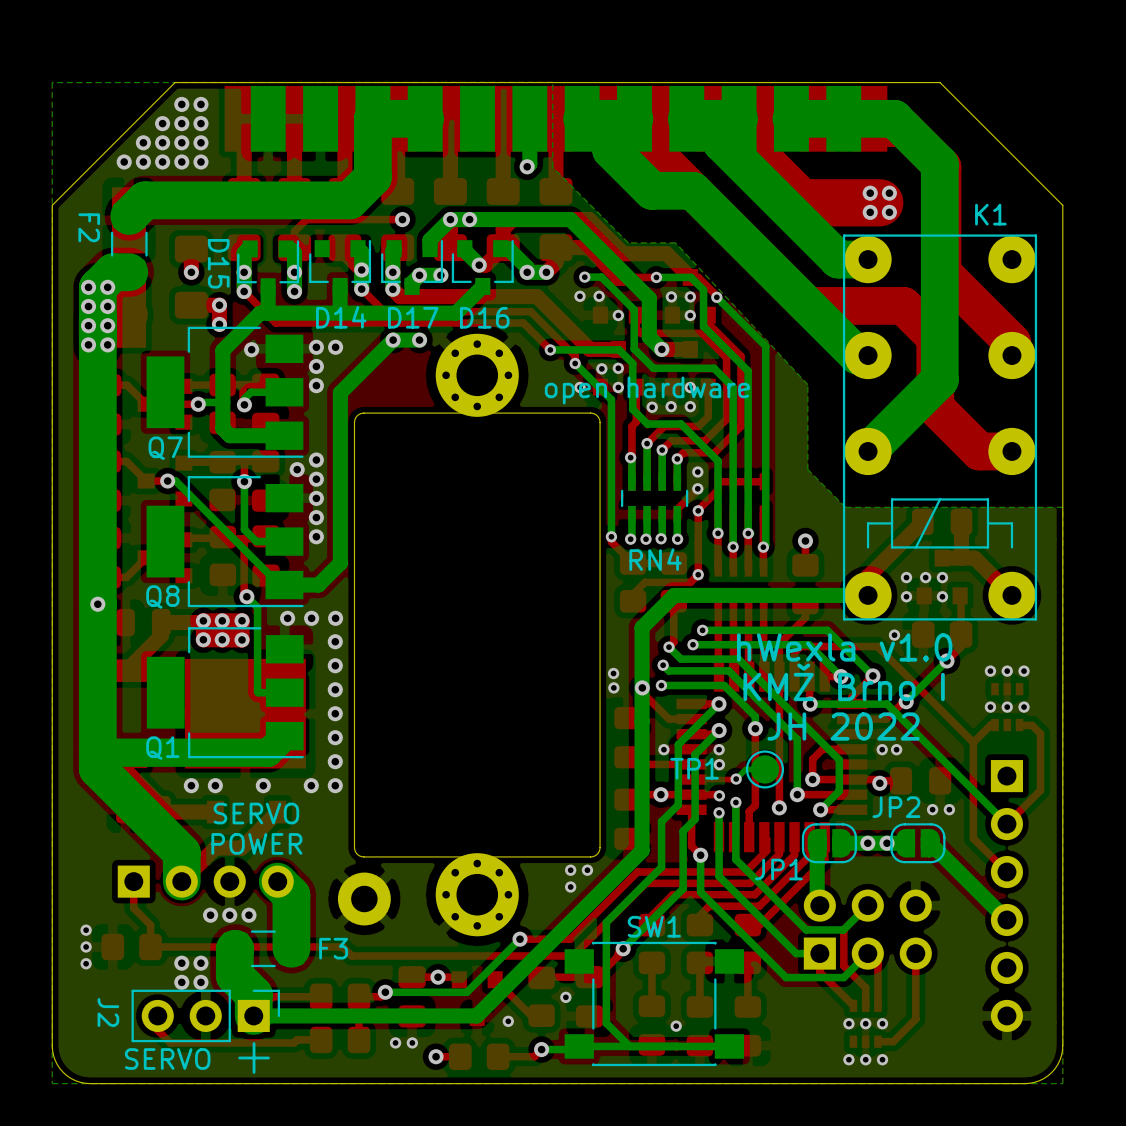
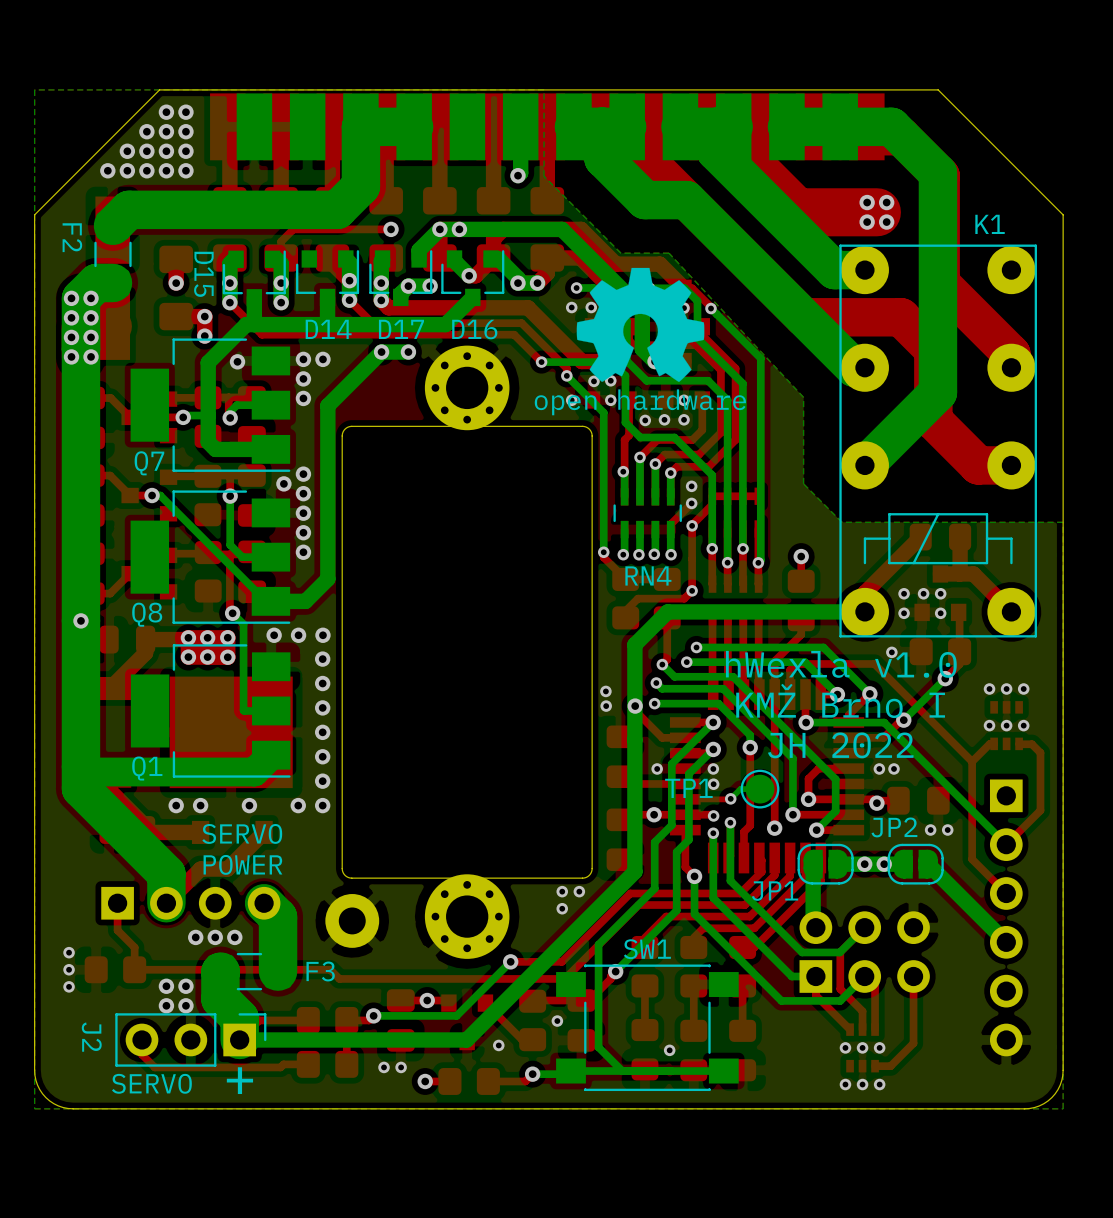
drawing: none -> [576, 267, 705, 382]

